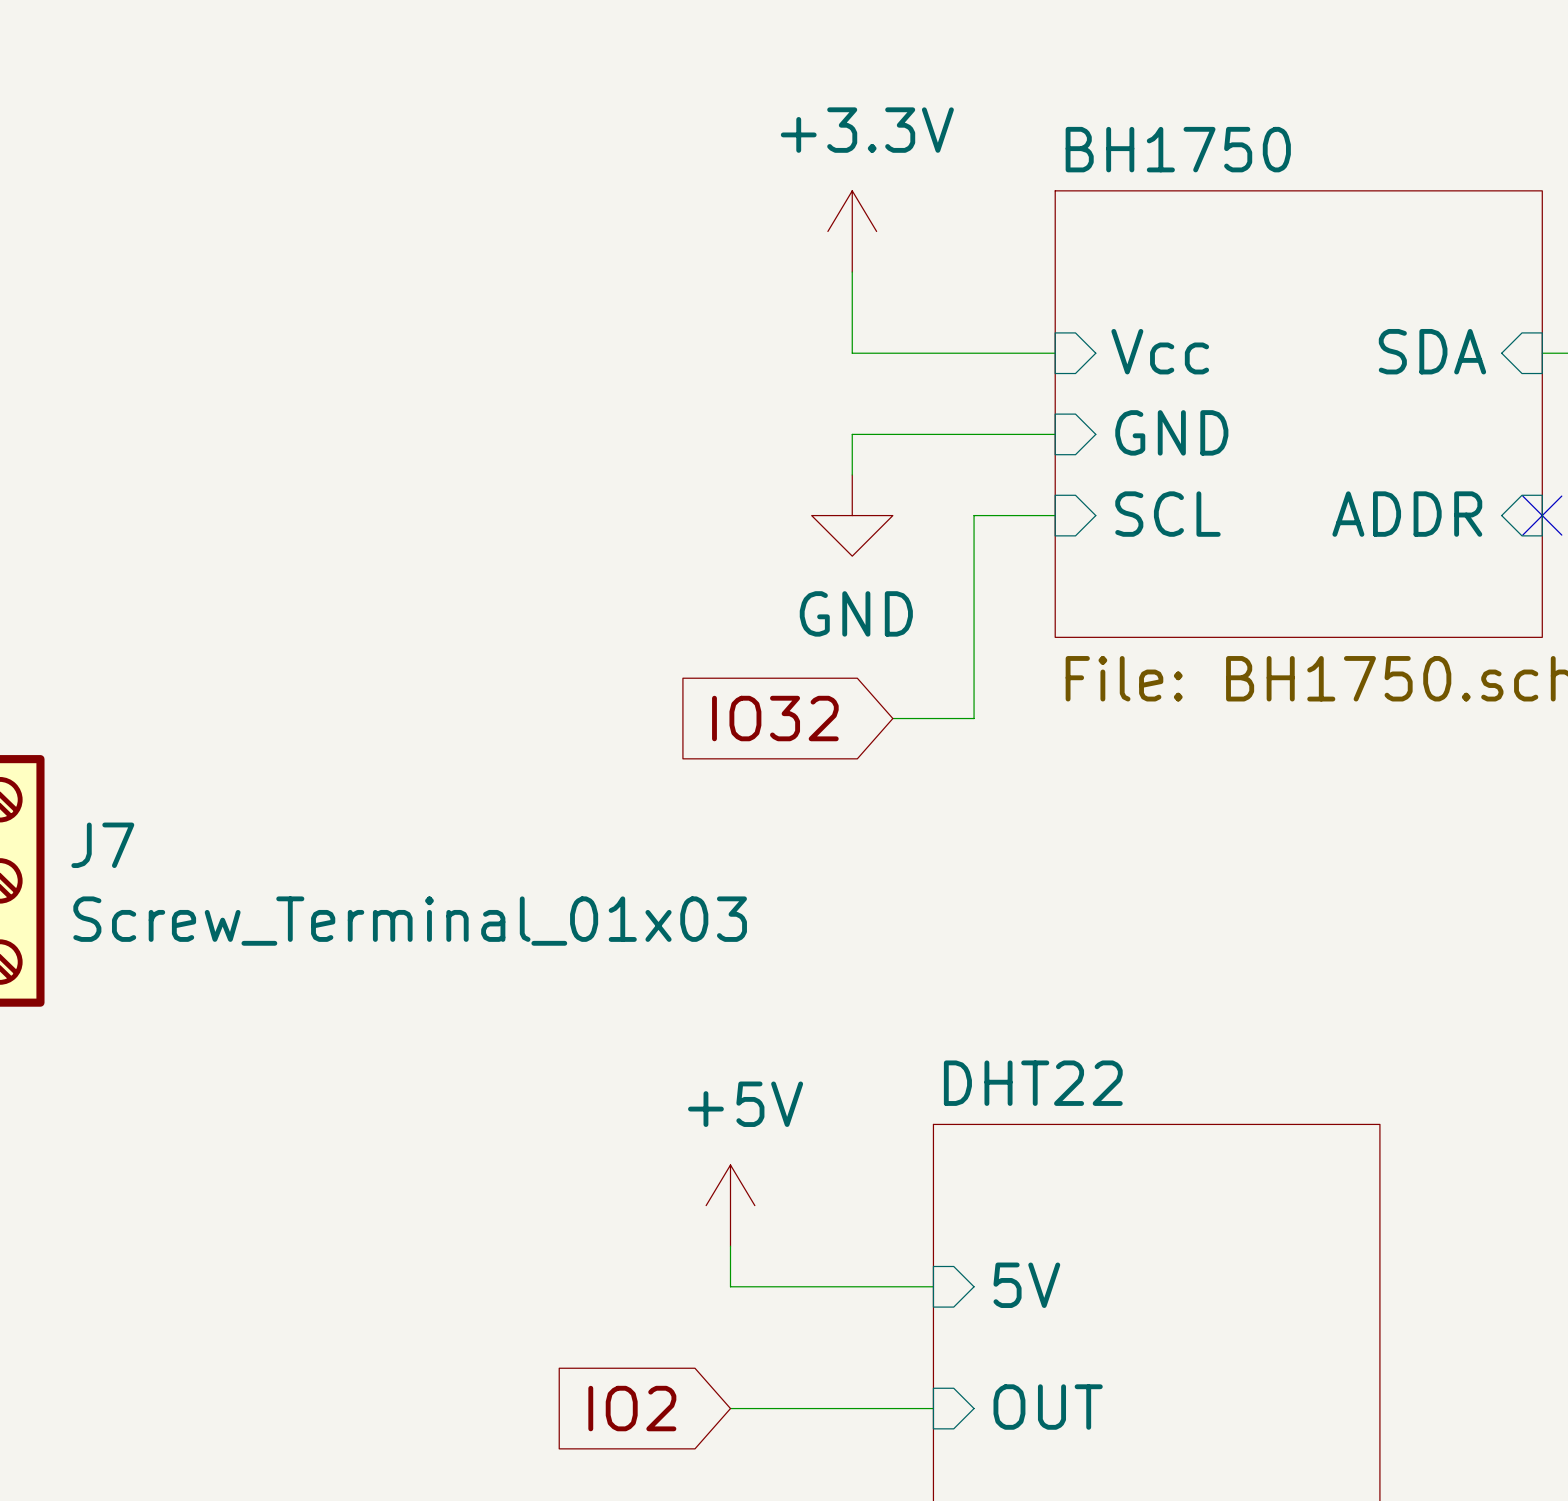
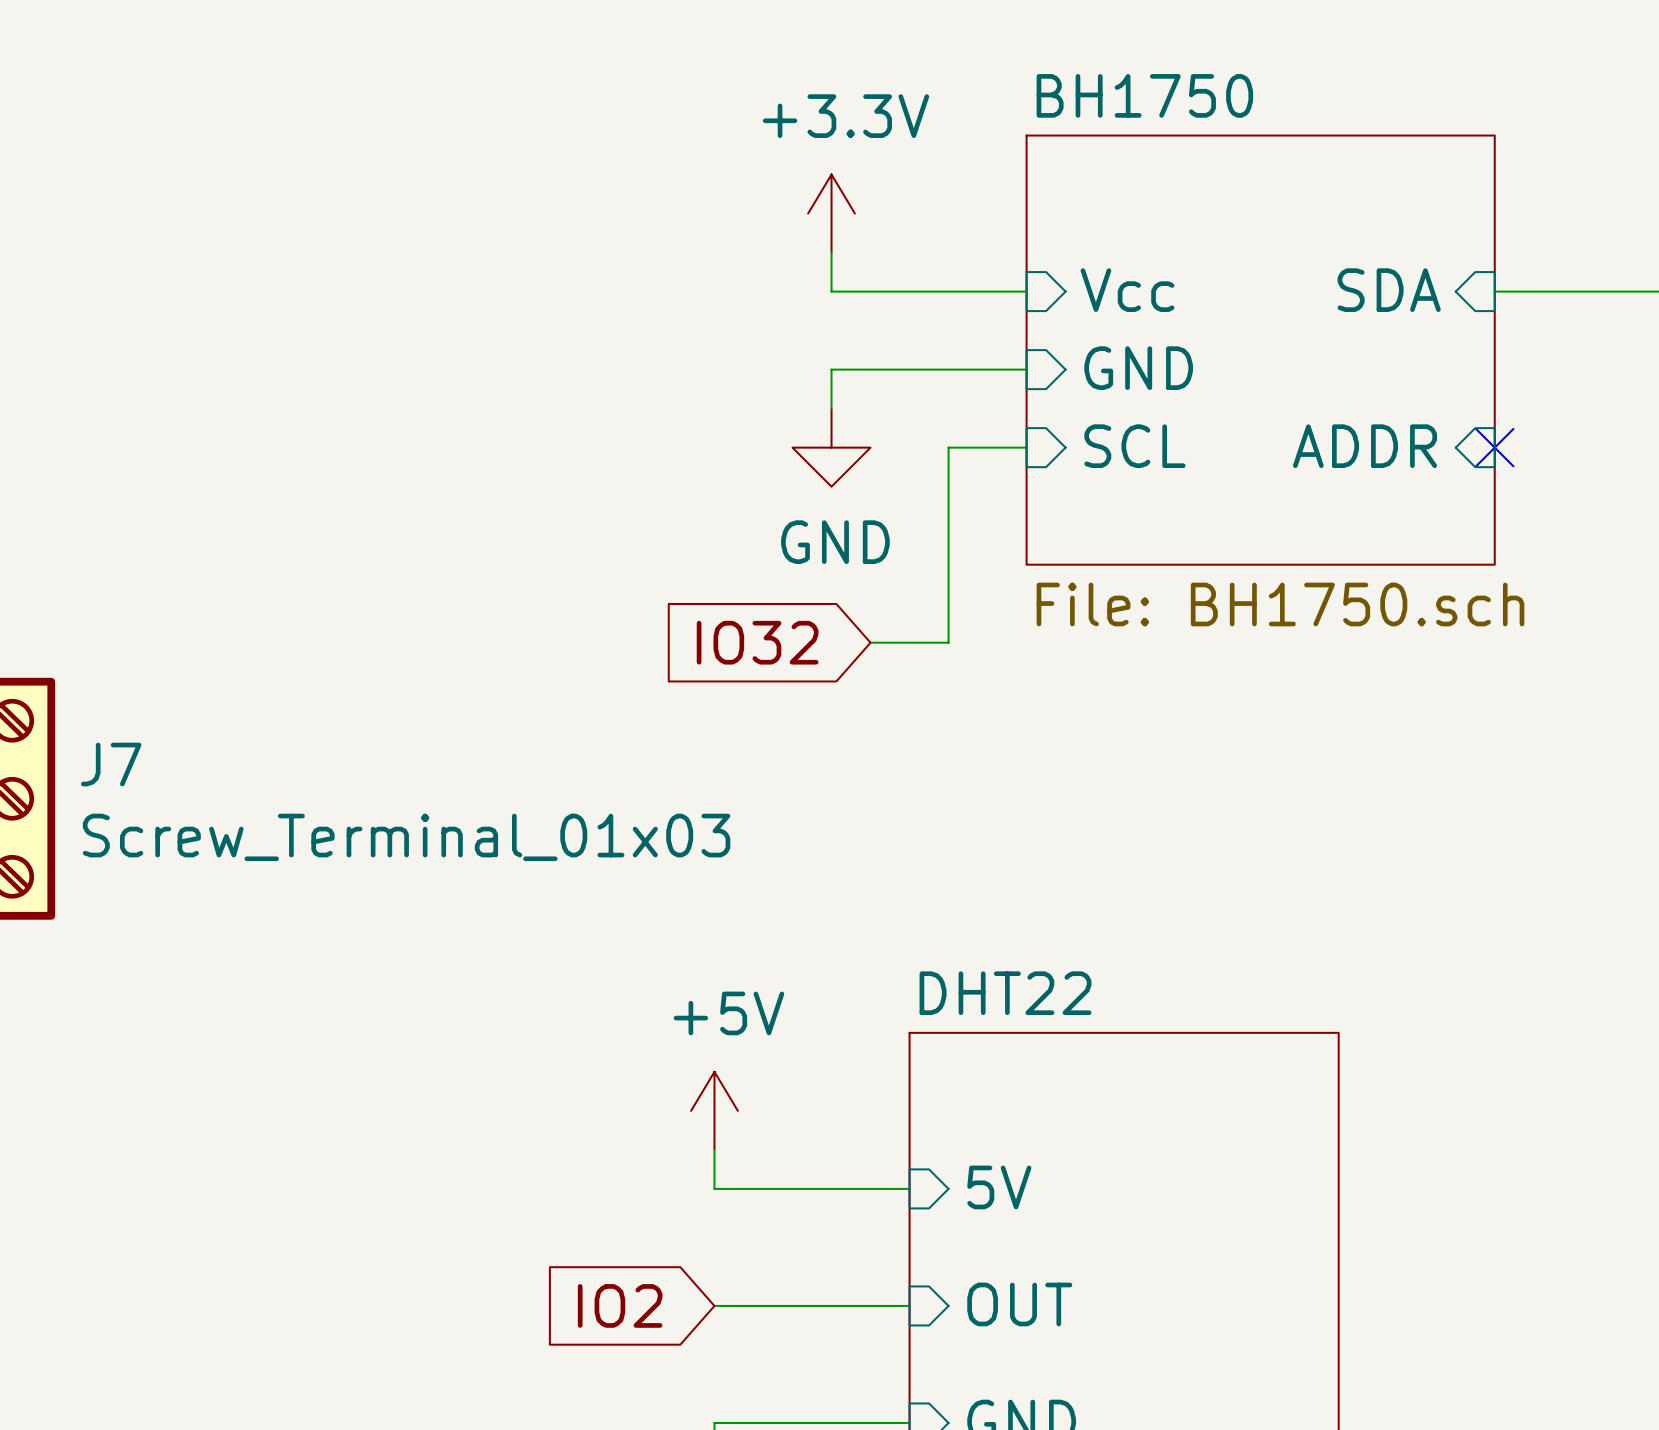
power symbol position: +3.3V (852, 231) -> +3.3V (831, 213)

